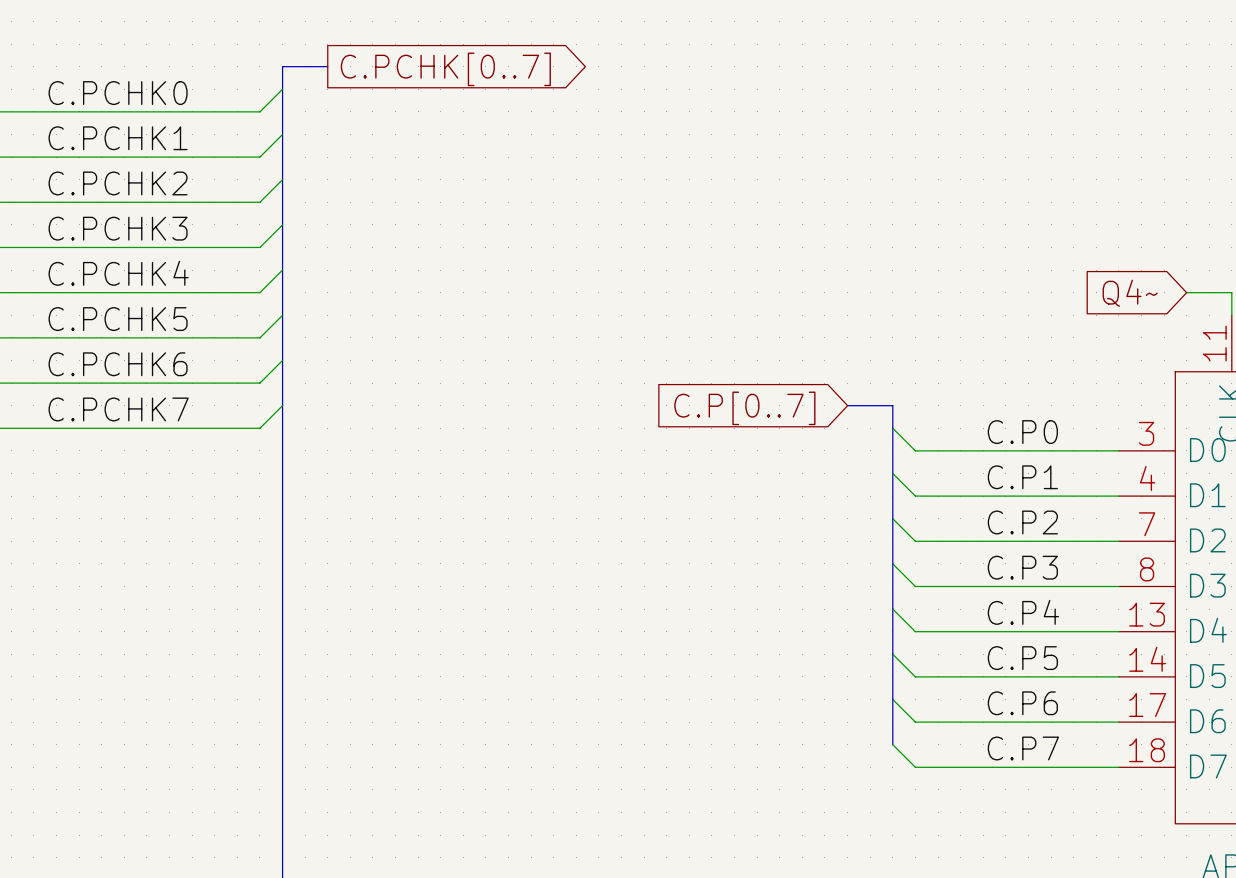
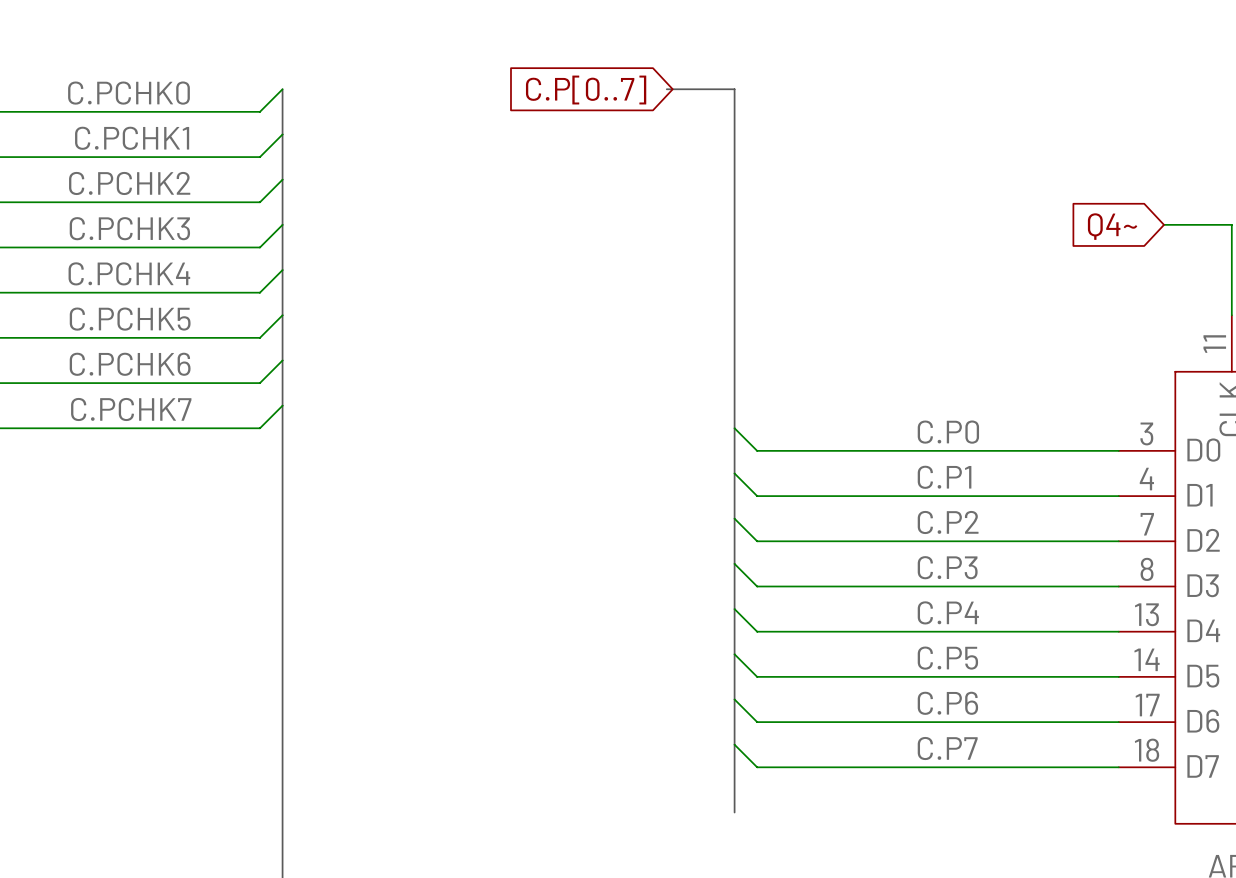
bus: (327, 66) (282, 66) (282, 89) -> none
global label: C.PCHK[0..7] (445, 69) -> none
bus: none -> (666, 89) (734, 89) (734, 812)
global label: none -> C.P[0..7] (586, 90)
wire: (1186, 292) (1231, 292) -> (1164, 224) (1231, 224) (1231, 292)
global label position: Q4~ (1130, 293) -> Q4~ (1112, 226)
bus: (847, 405) (892, 405) (892, 744) -> none
global label: C.P[0..7] (744, 408) -> none
wire: (892, 428) (915, 450) -> (734, 428) (757, 450) (915, 450)
label position: C.P0 (1022, 432) -> C.P0 (948, 432)
wire: (892, 473) (915, 496) -> (734, 473) (757, 496) (915, 496)
label position: C.P1 (1022, 477) -> C.P1 (944, 477)
wire: (892, 518) (915, 541) -> (734, 518) (757, 541) (915, 541)
label position: C.P2 (1022, 522) -> C.P2 (948, 522)
wire: (892, 563) (915, 586) -> (734, 563) (757, 586) (915, 586)
label position: C.P3 (1022, 567) -> C.P3 (947, 567)
wire: (892, 609) (915, 631) -> (734, 609) (757, 631) (915, 631)
label position: C.P4 (1023, 612) -> C.P4 (948, 612)
wire: (892, 654) (915, 676) -> (734, 654) (757, 676) (915, 676)
label position: C.P5 (1022, 658) -> C.P5 (947, 658)
wire: (892, 699) (915, 722) -> (734, 699) (757, 722) (915, 722)
label position: C.P6 (1022, 703) -> C.P6 (947, 703)
wire: (892, 744) (915, 767) -> (734, 744) (757, 767) (915, 767)
label position: C.P7 (1023, 748) -> C.P7 (947, 748)

